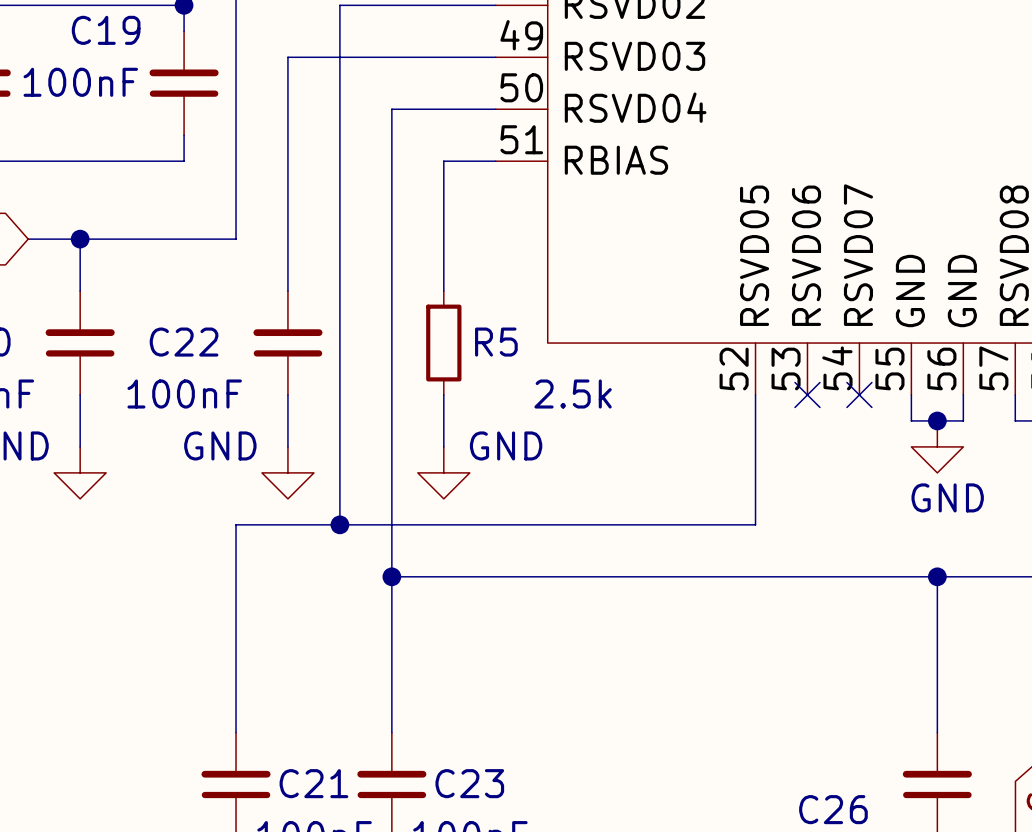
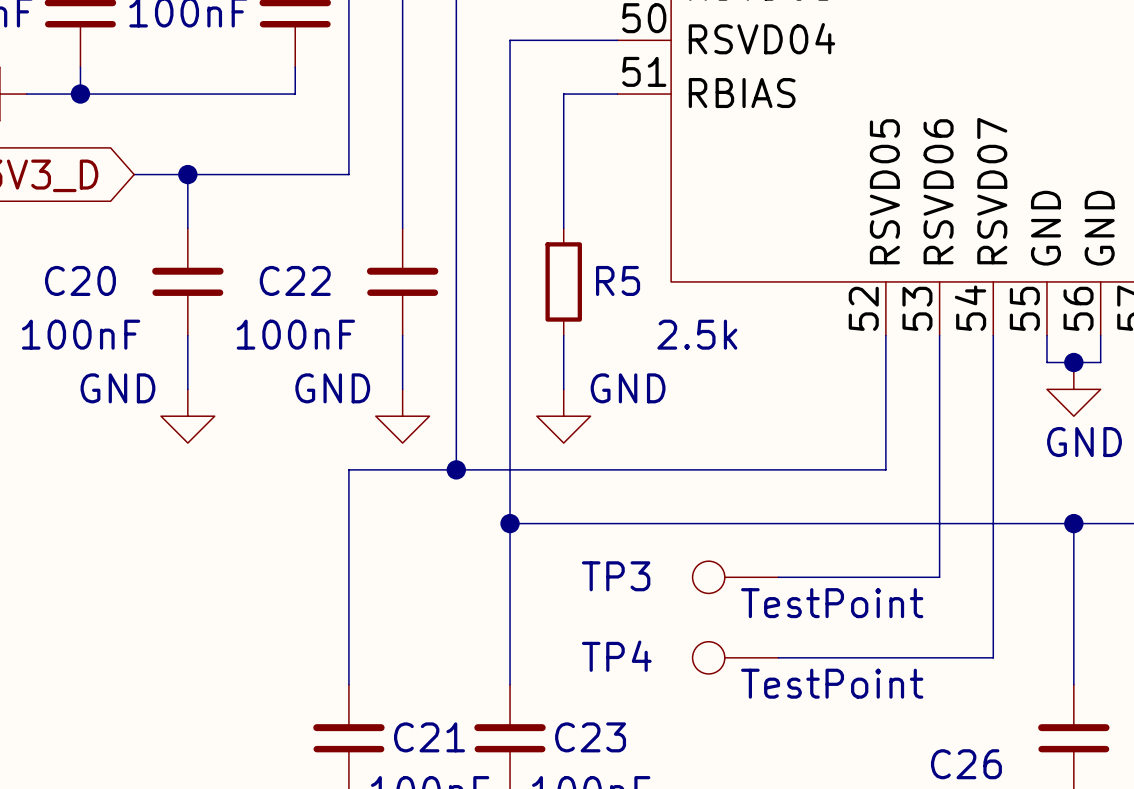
wire: none -> (939, 335) (939, 577) (778, 577)
no-connect mark: (807, 394) -> none
wire: none -> (993, 335) (993, 657) (778, 657)
no-connect mark: (859, 394) -> none
TP3: none -> TestPoint (735, 577)
TP4: none -> TestPoint (735, 657)

